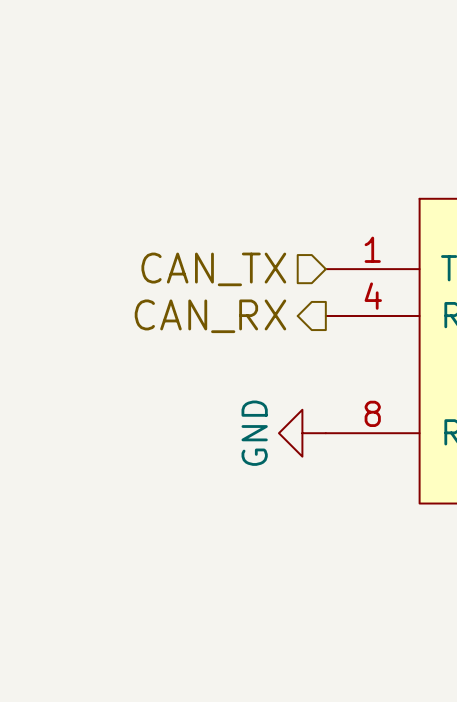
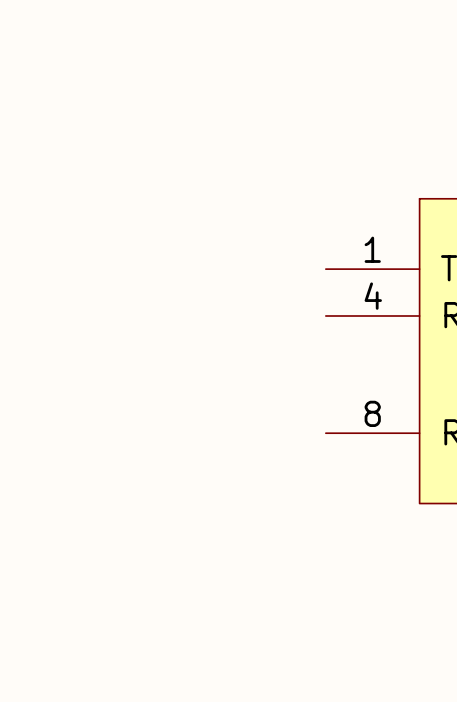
hierarchical label: CAN_TX (213, 269) -> none
hierarchical label: CAN_RX (210, 316) -> none
power symbol: GND (302, 433) -> none

